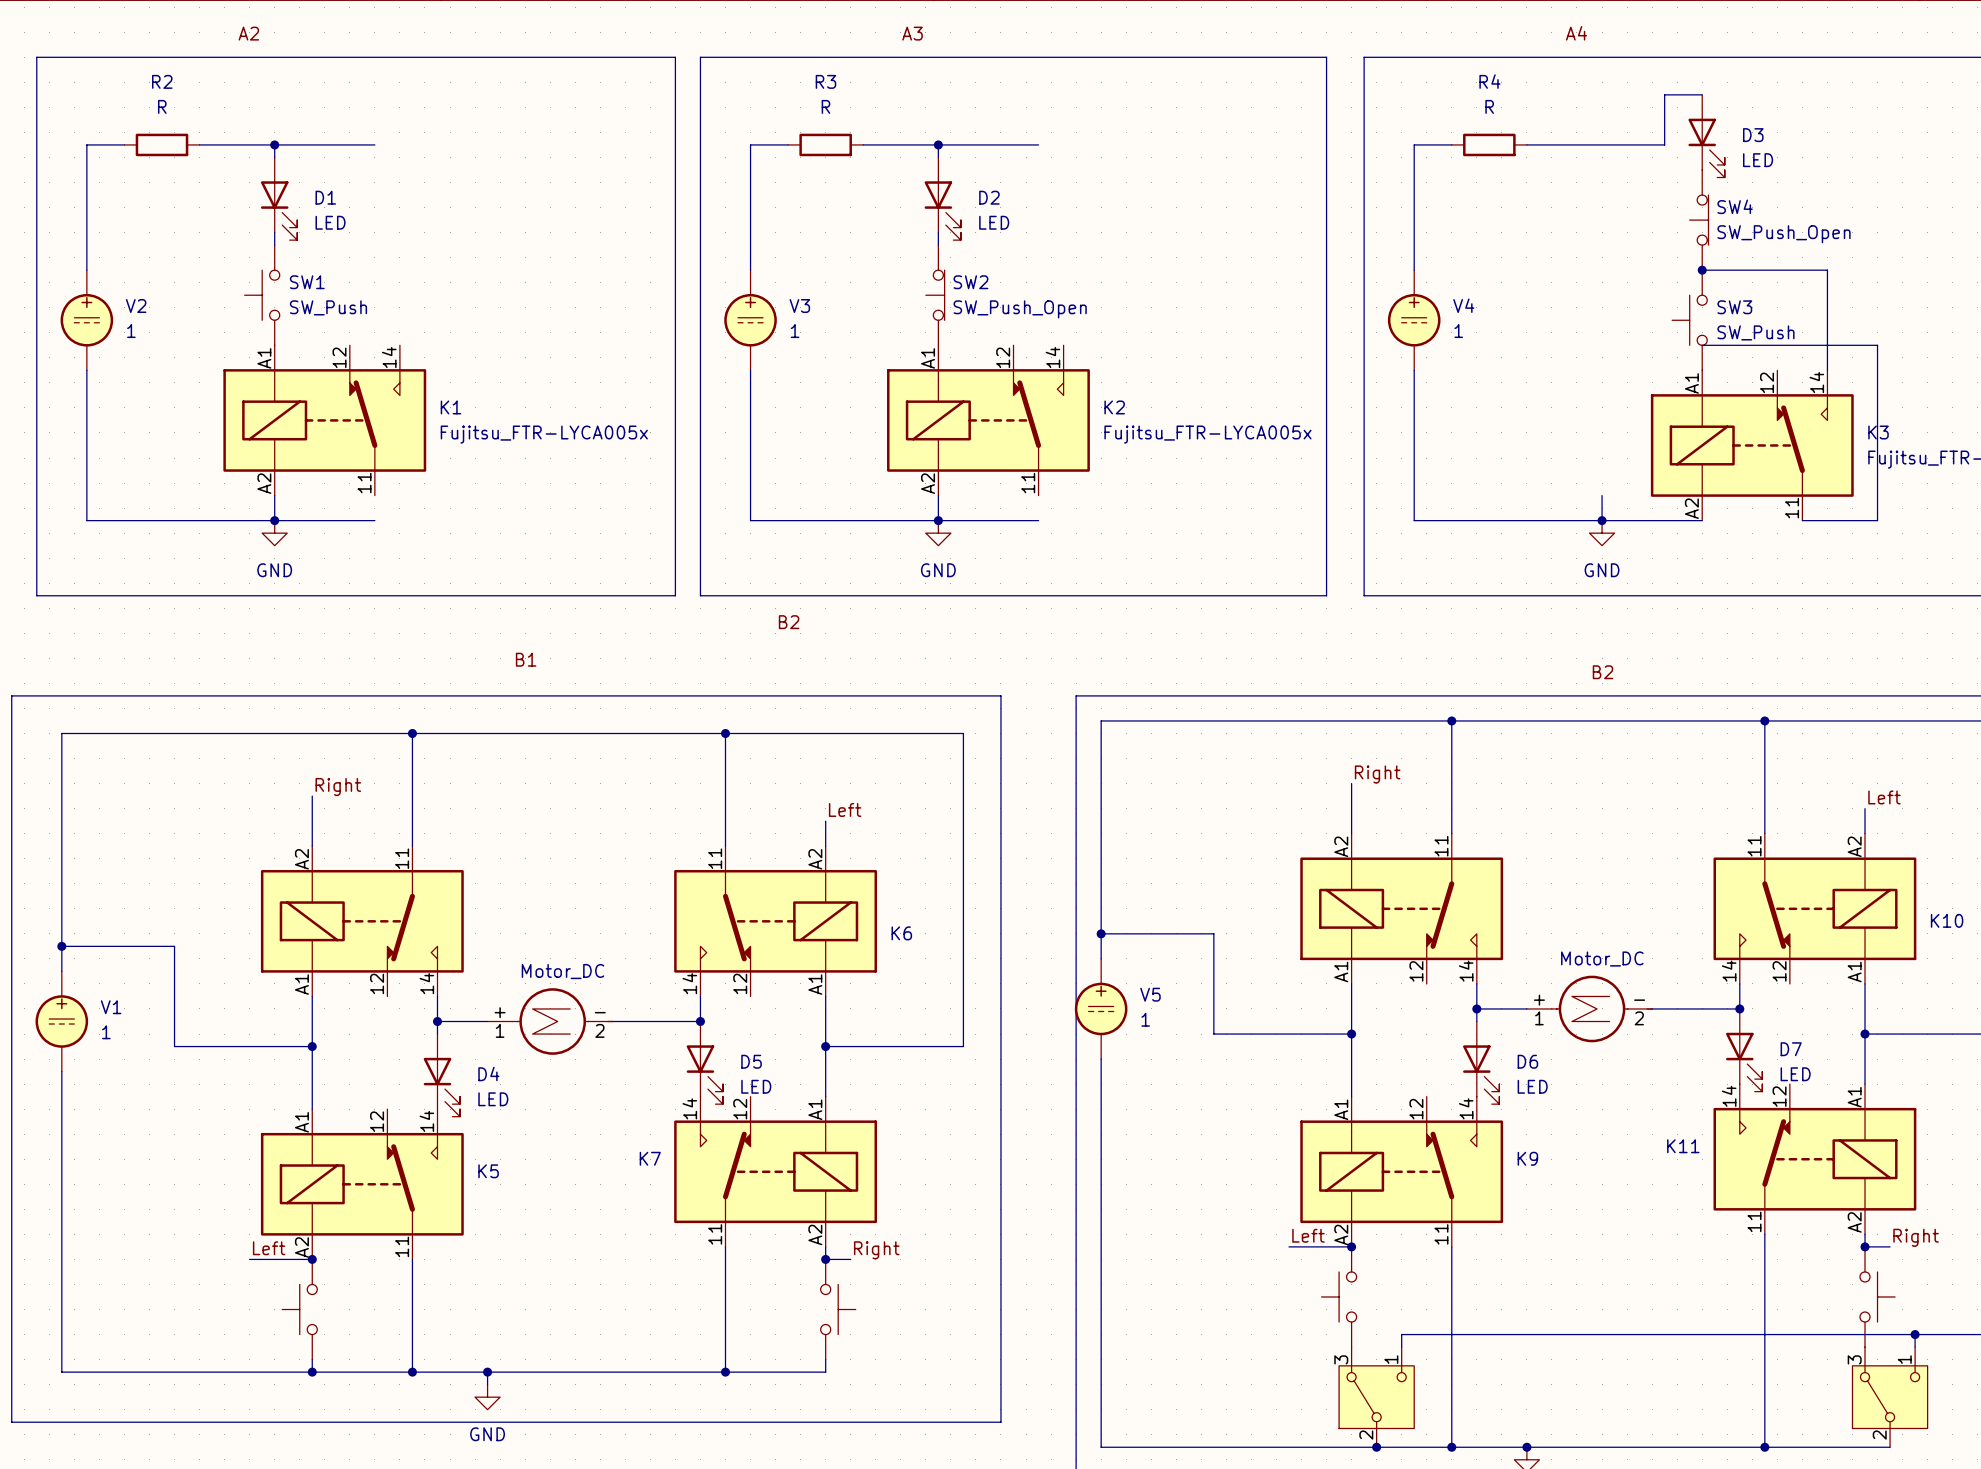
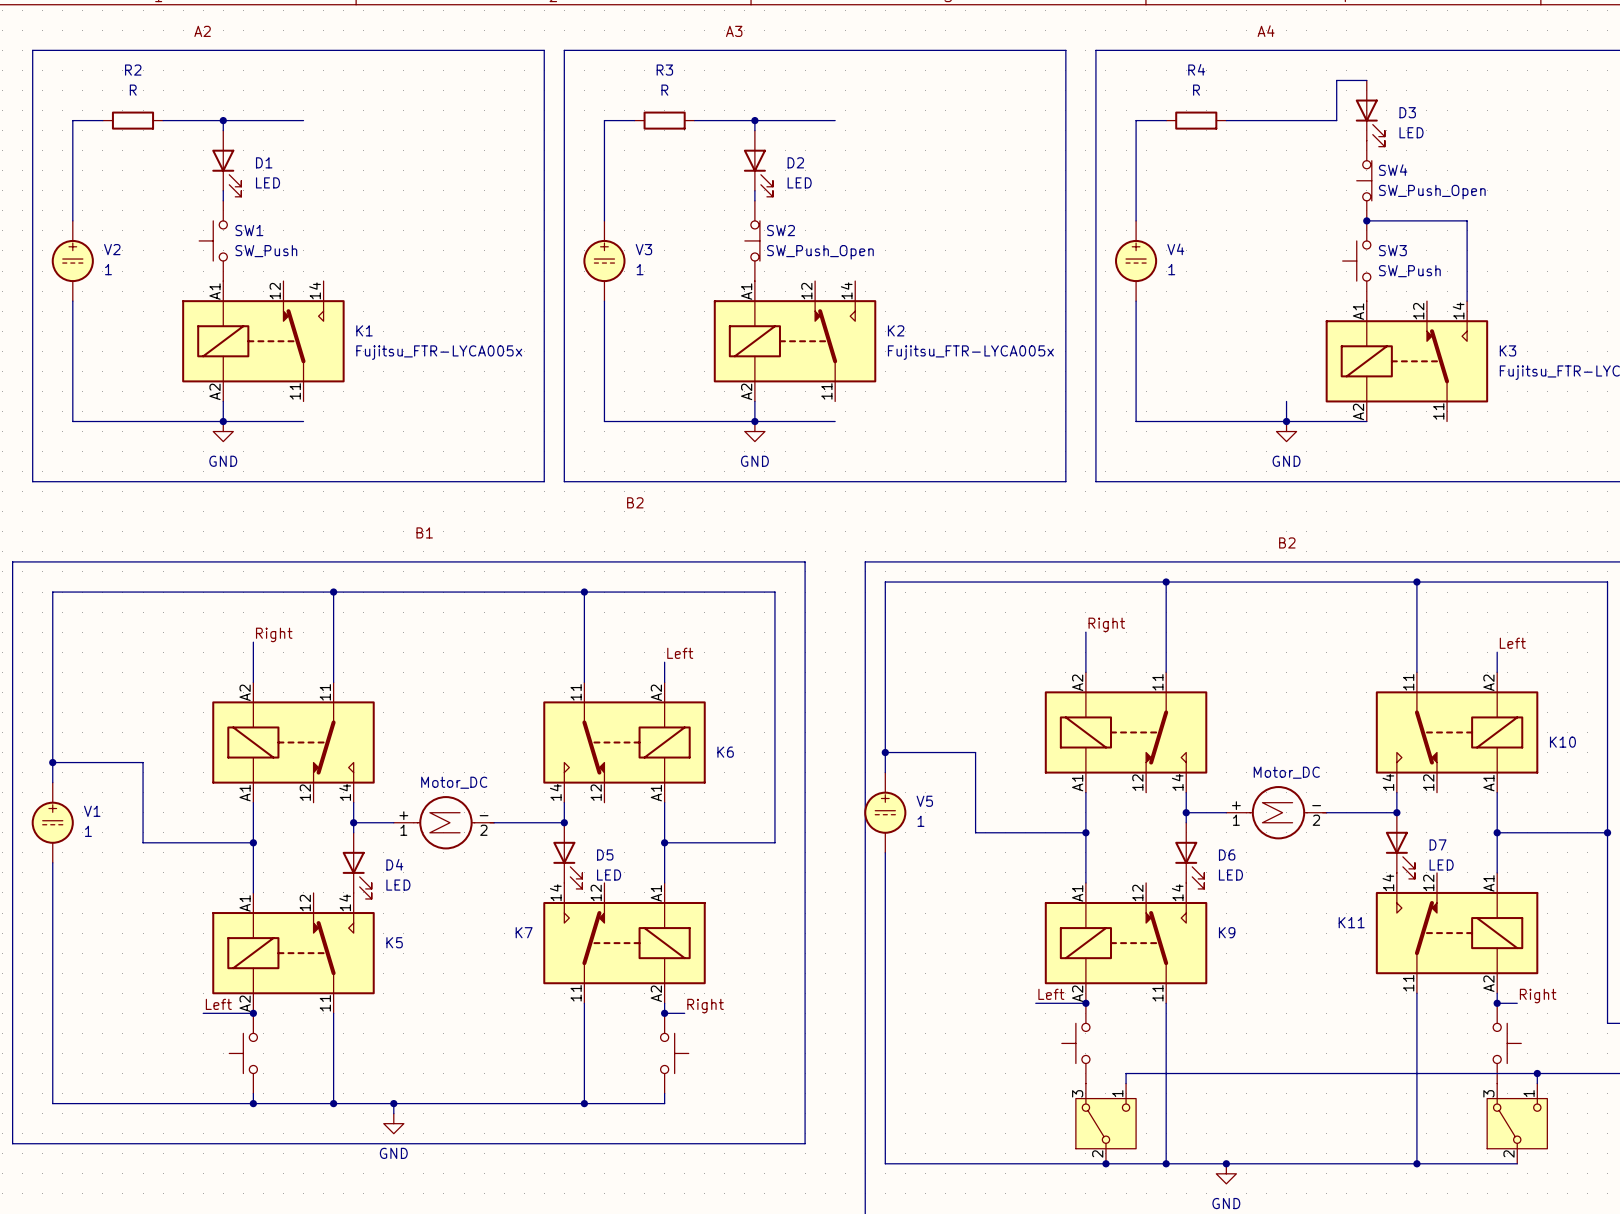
wire: (1702, 345) (1877, 345) (1877, 520) (1802, 520) -> none

